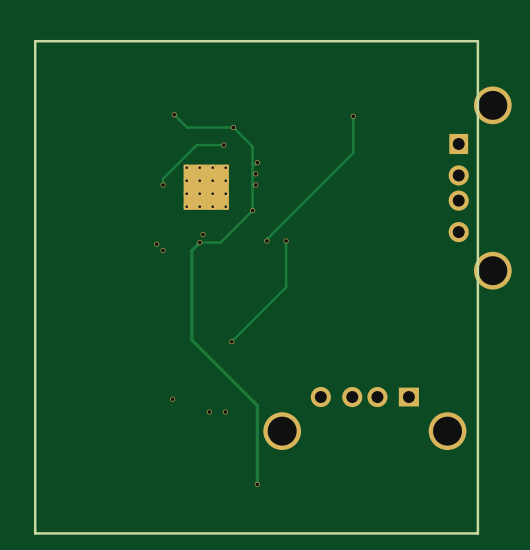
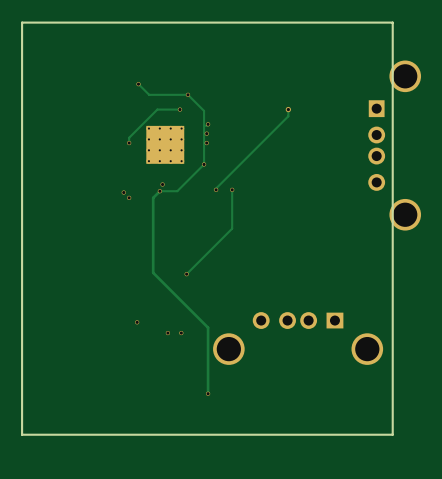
track: (353, 116) (353, 145) -> none
via: (353, 116) -> none
via: none -> (288, 109)

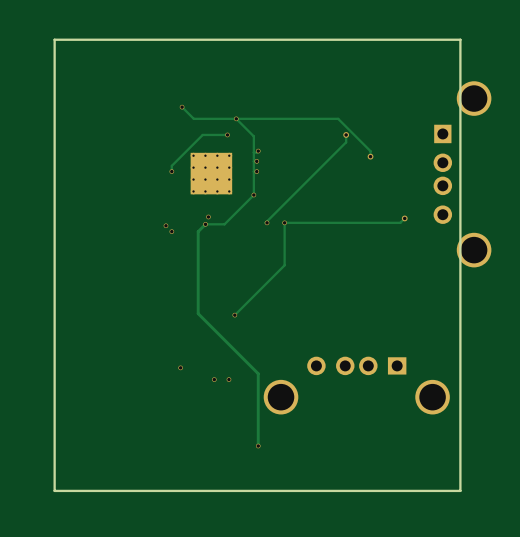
track: none -> (236, 118) (338, 118) (370, 151) (370, 156)
via: none -> (370, 156)
track: none -> (404, 218) (400, 222) (284, 222)
via: none -> (404, 218)

